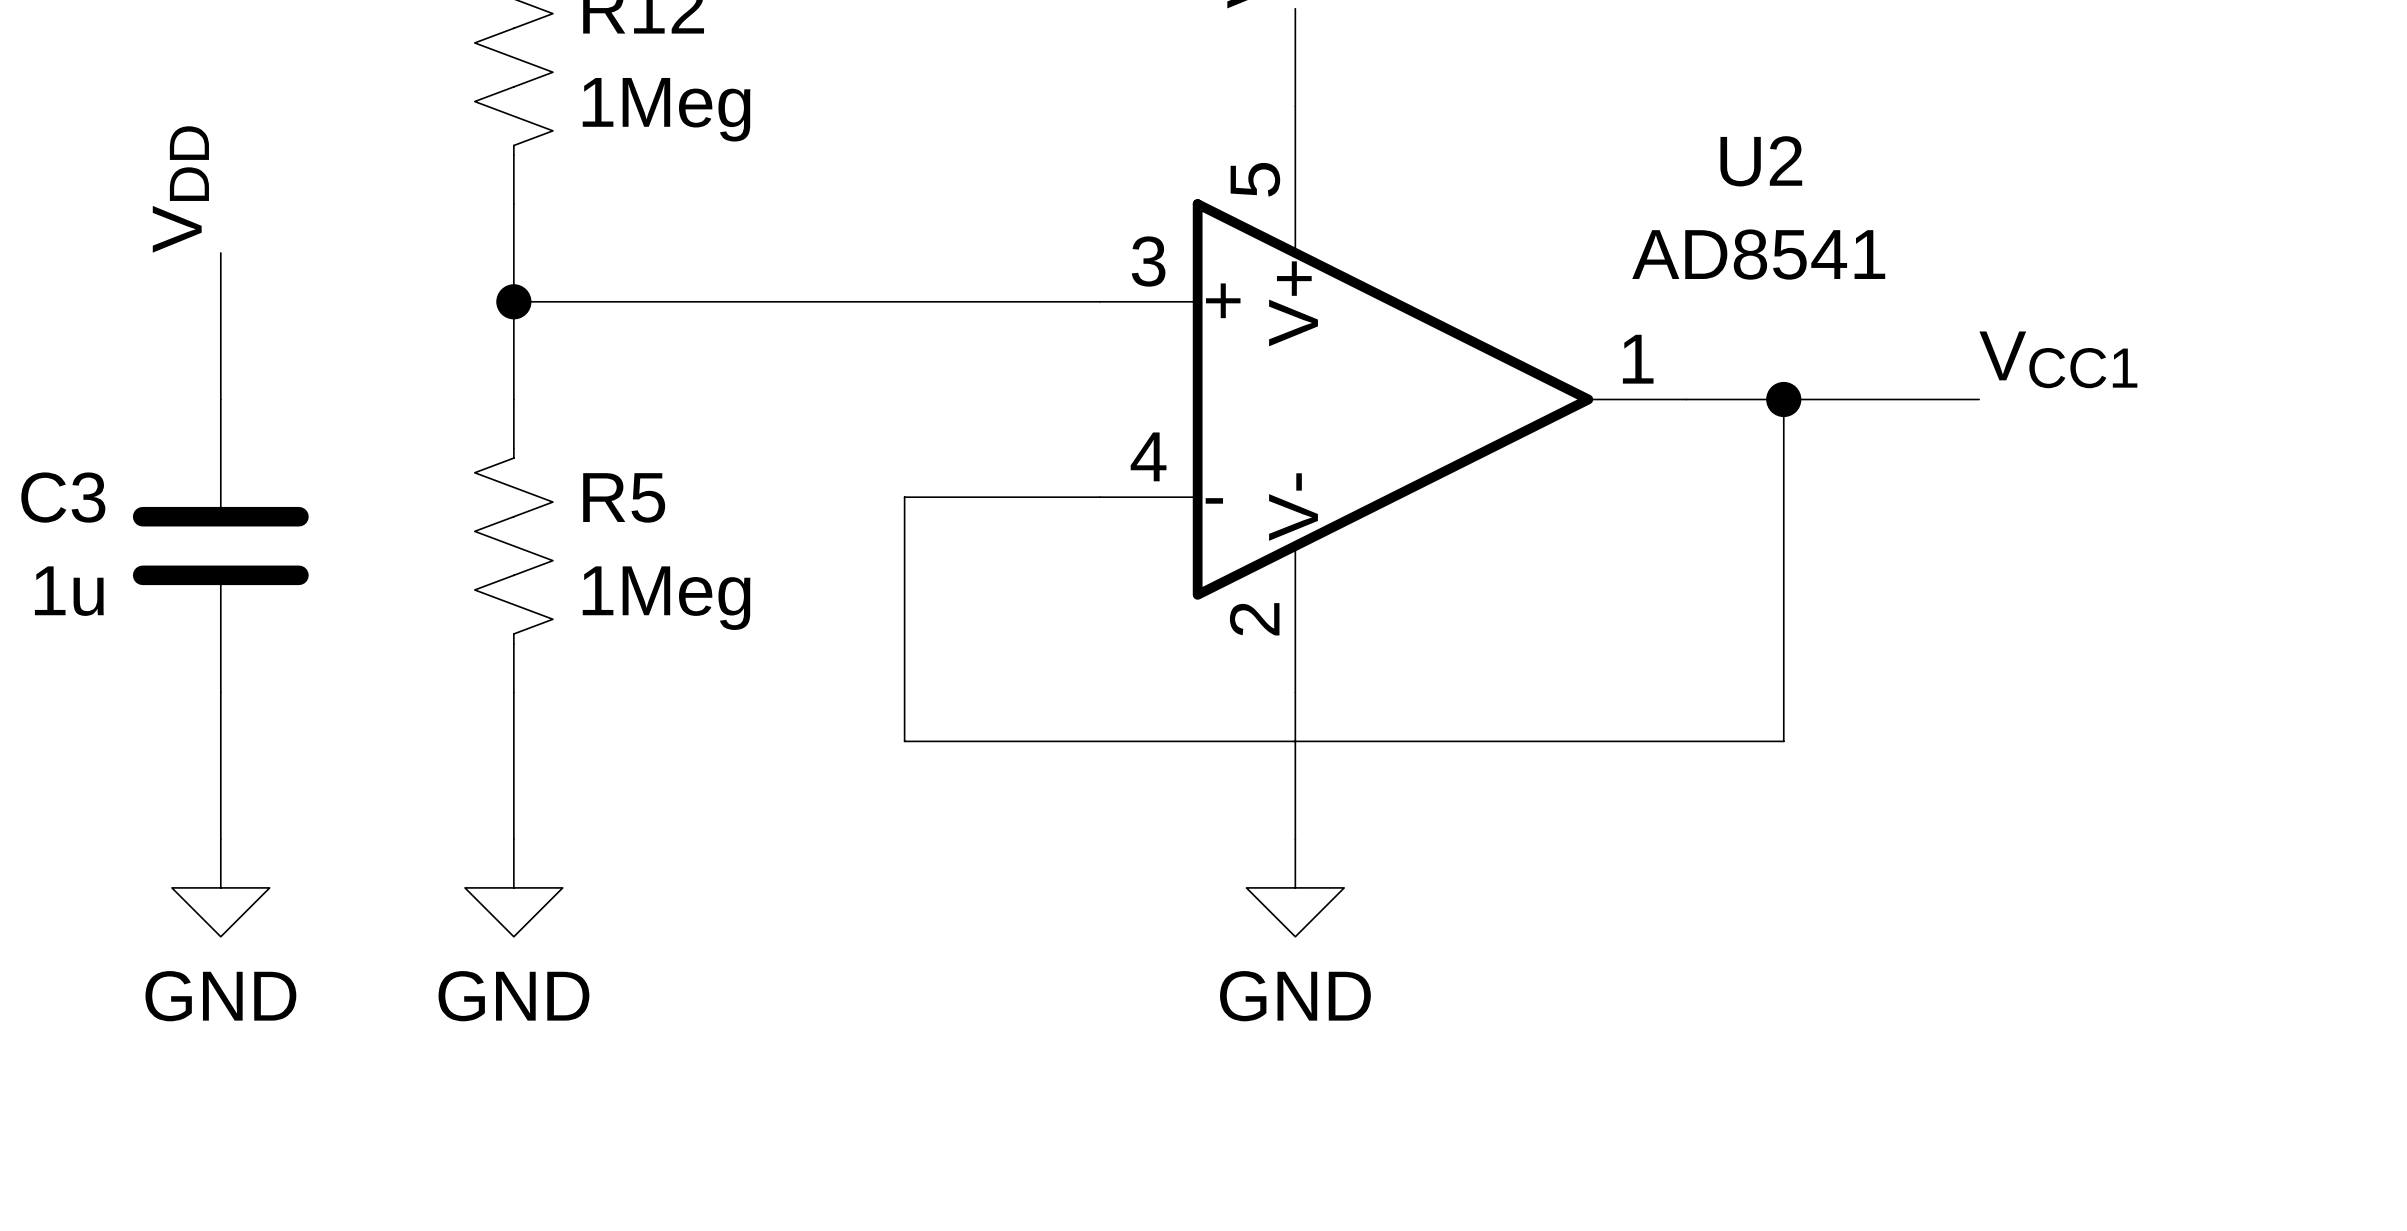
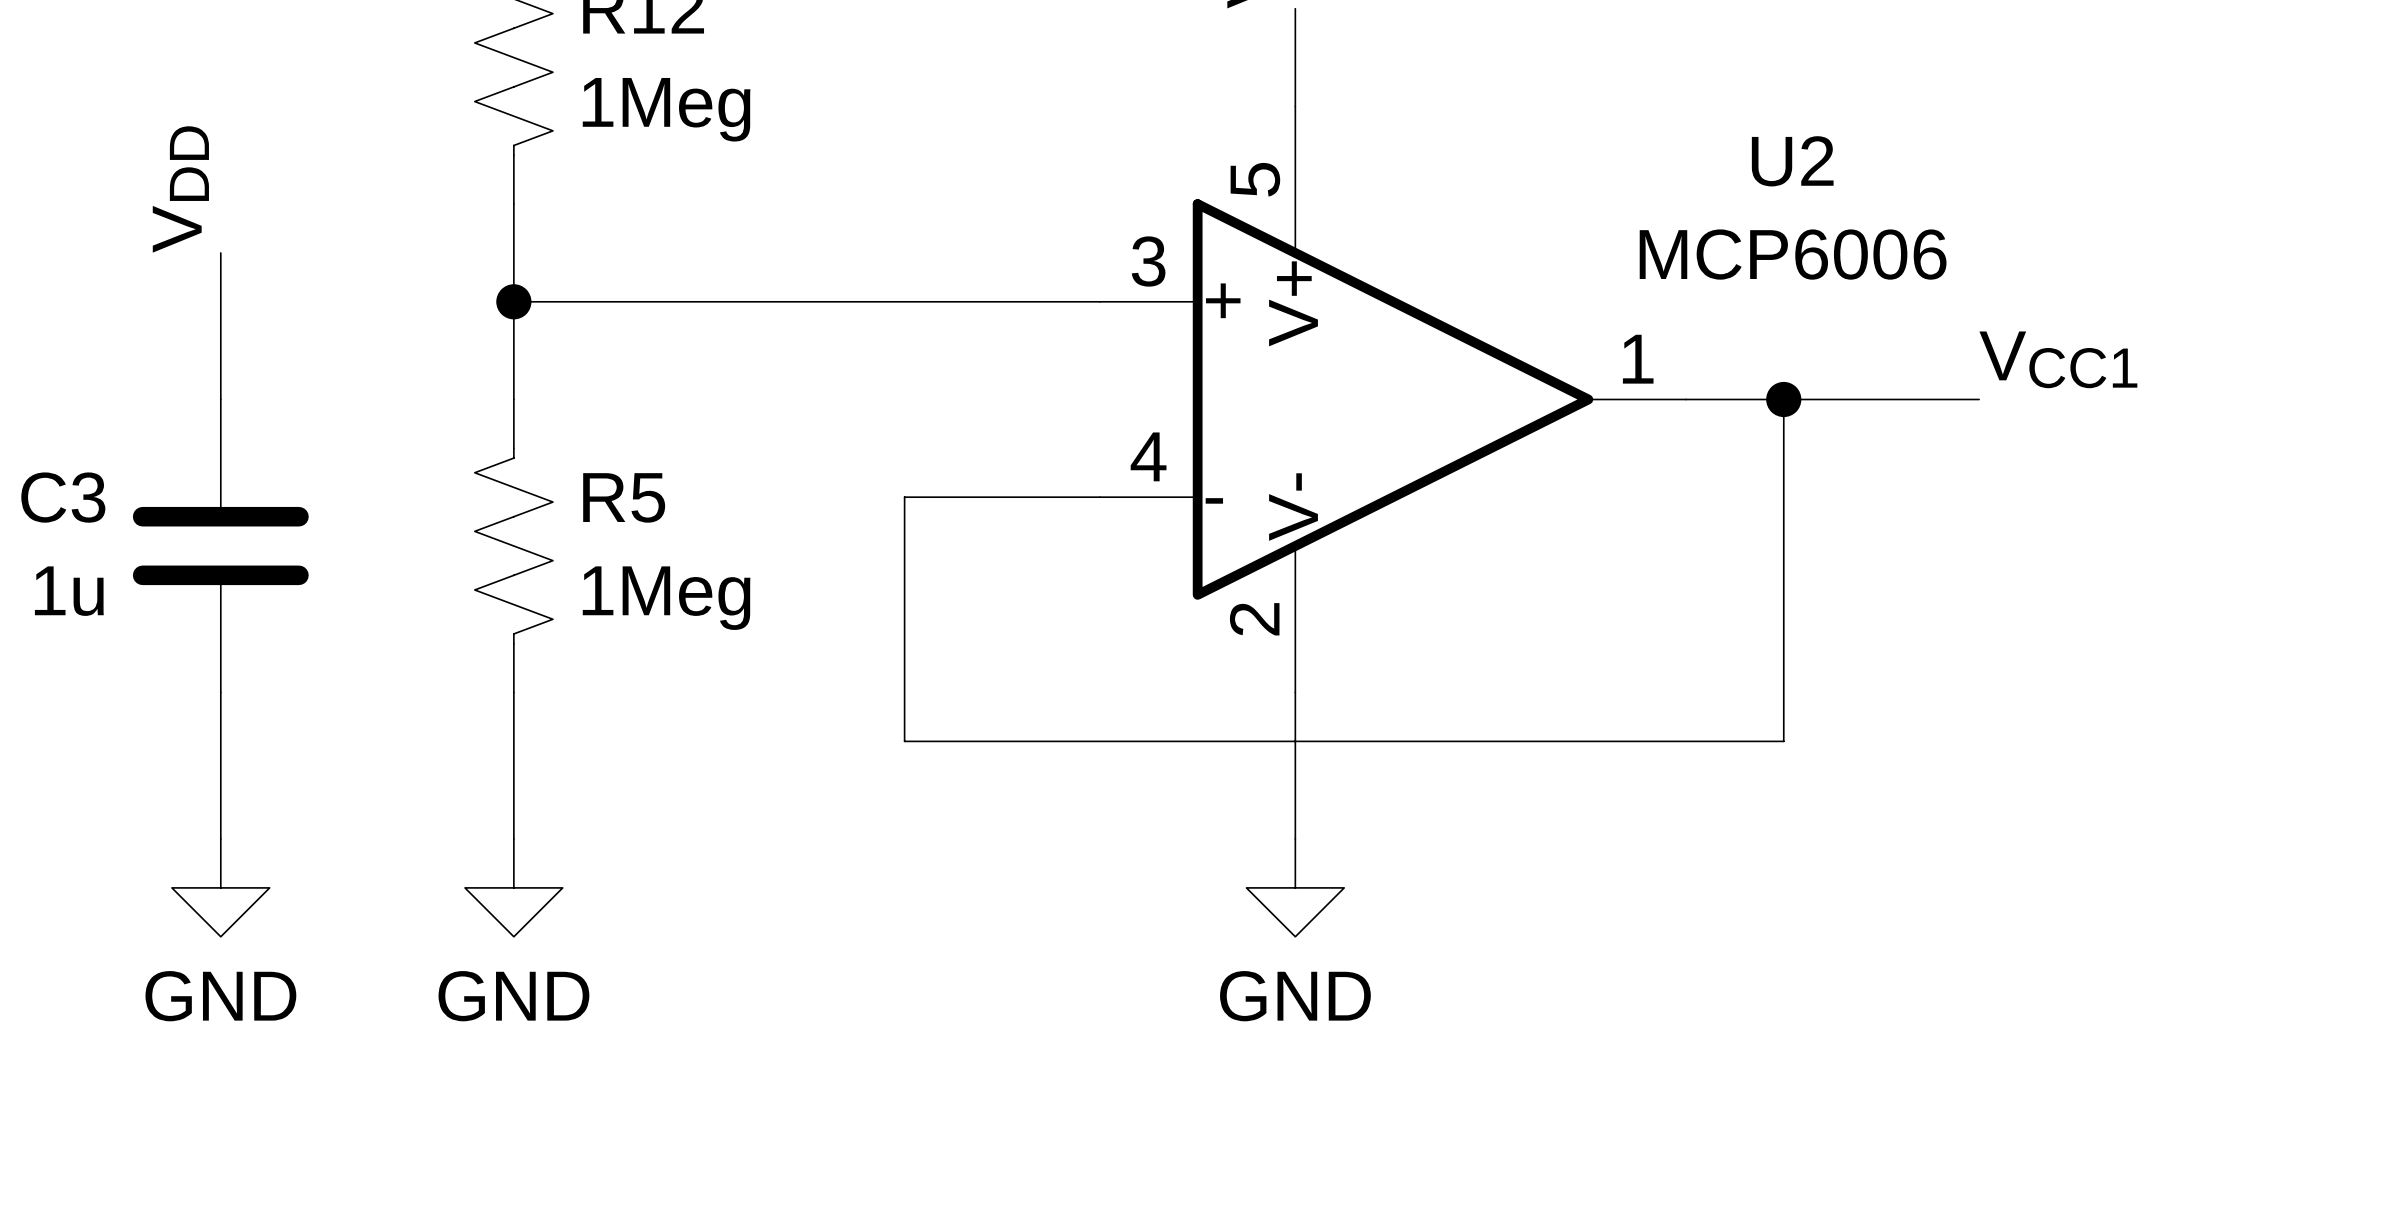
U2 name position: U2 (1761, 161) -> U2 (1792, 161)
U2 value: AD8541 (1758, 254) -> MCP6006 (1793, 254)

